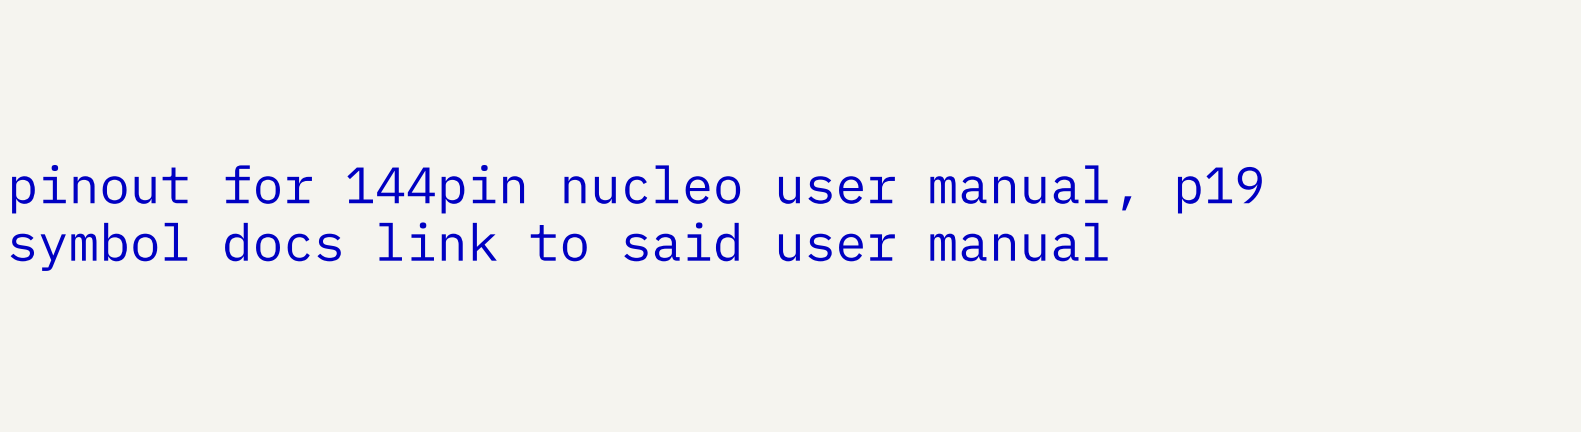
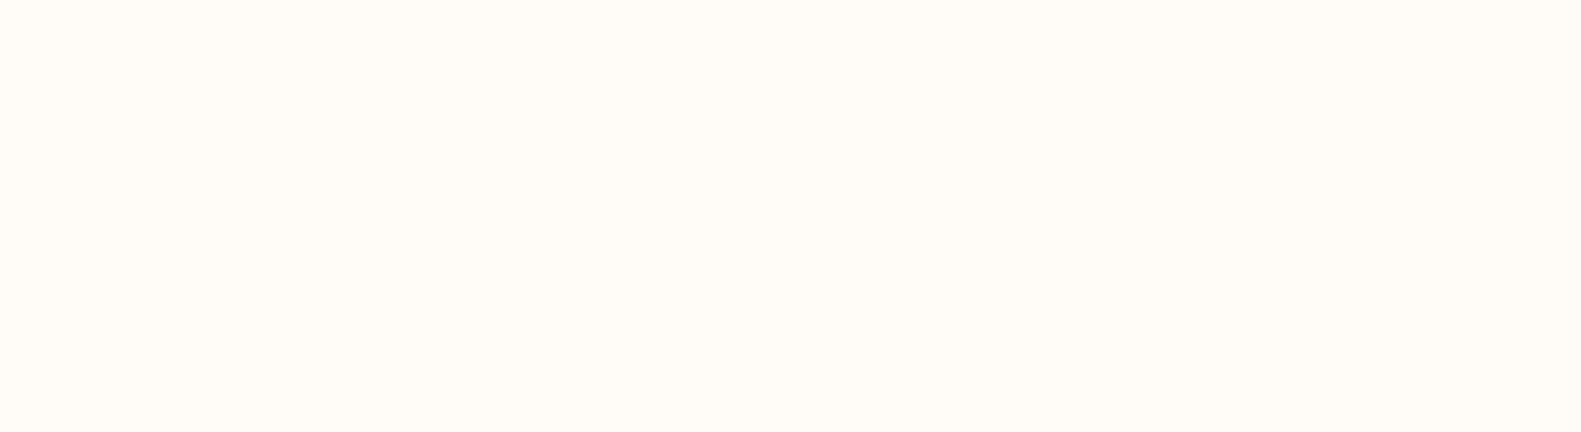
text: pinout for 144pin nucleo user manual, p19 (636, 189) -> none
text: symbol docs link to said user manual (559, 246) -> none

